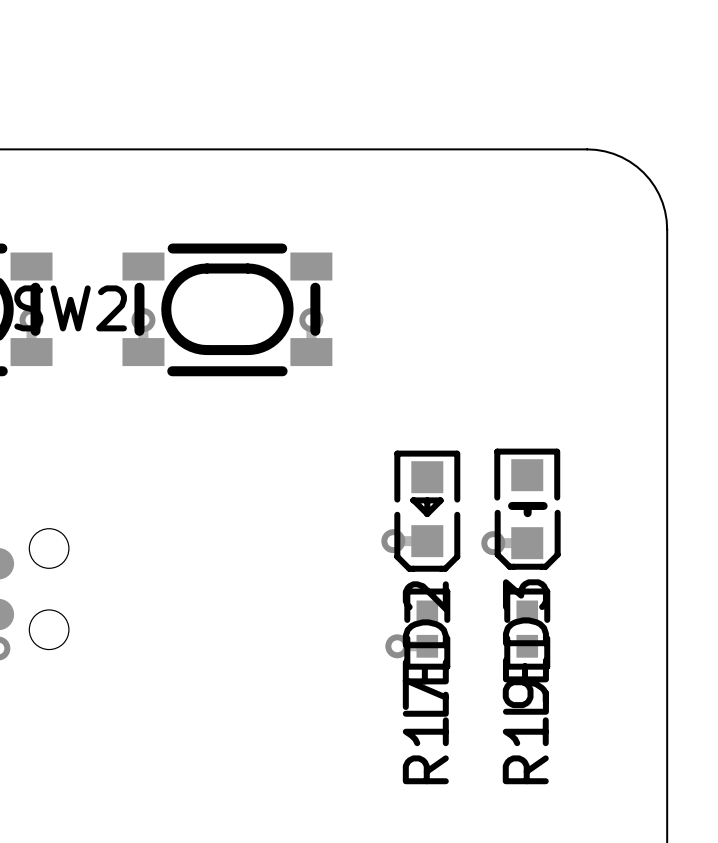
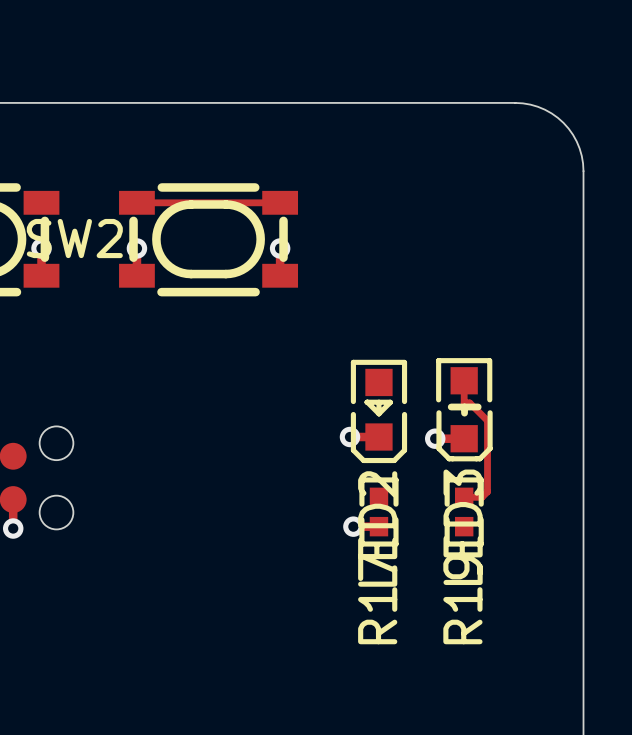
track: none -> (136, 202) (280, 202)
track: none -> (464, 380) (464, 402) (469, 402) (487, 420) (487, 491) (481, 497) (464, 497)

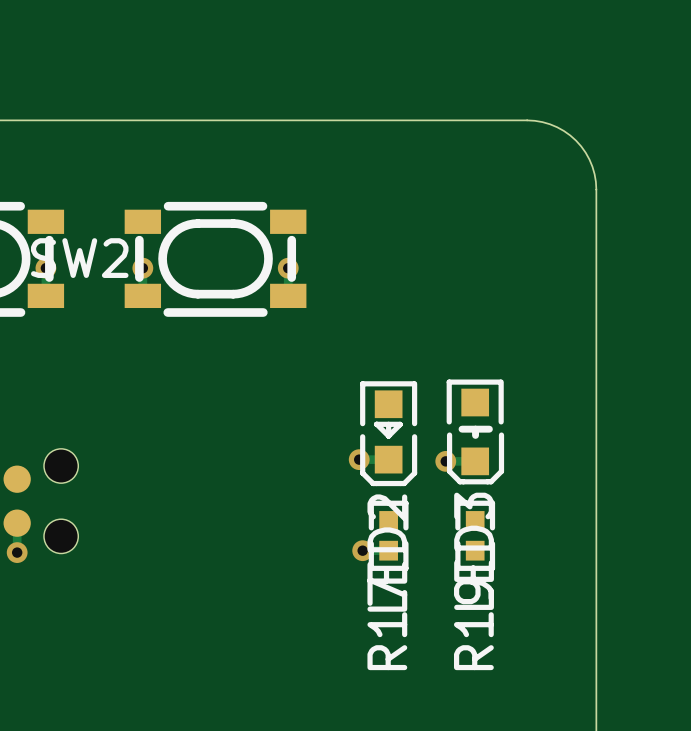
track: (136, 202) (280, 202) -> none
track: (464, 380) (464, 402) (469, 402) (487, 420) (487, 491) (481, 497) (464, 497) -> none

